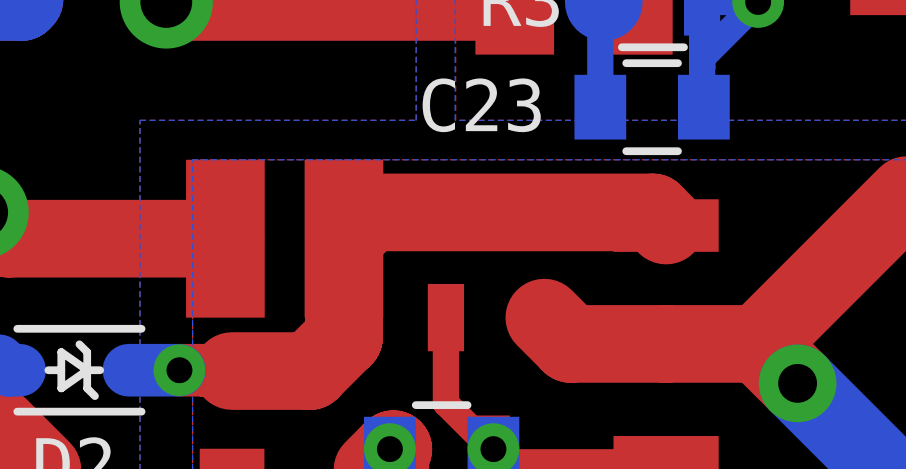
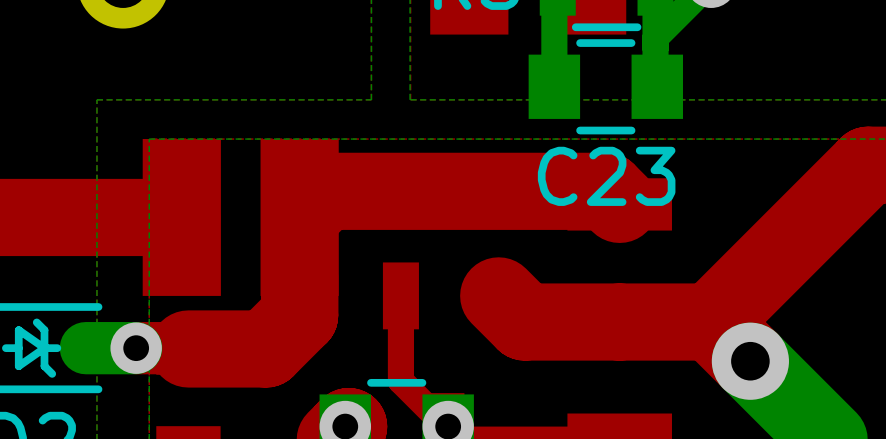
C23 name position: C23 (481, 105) -> C23 (606, 176)

